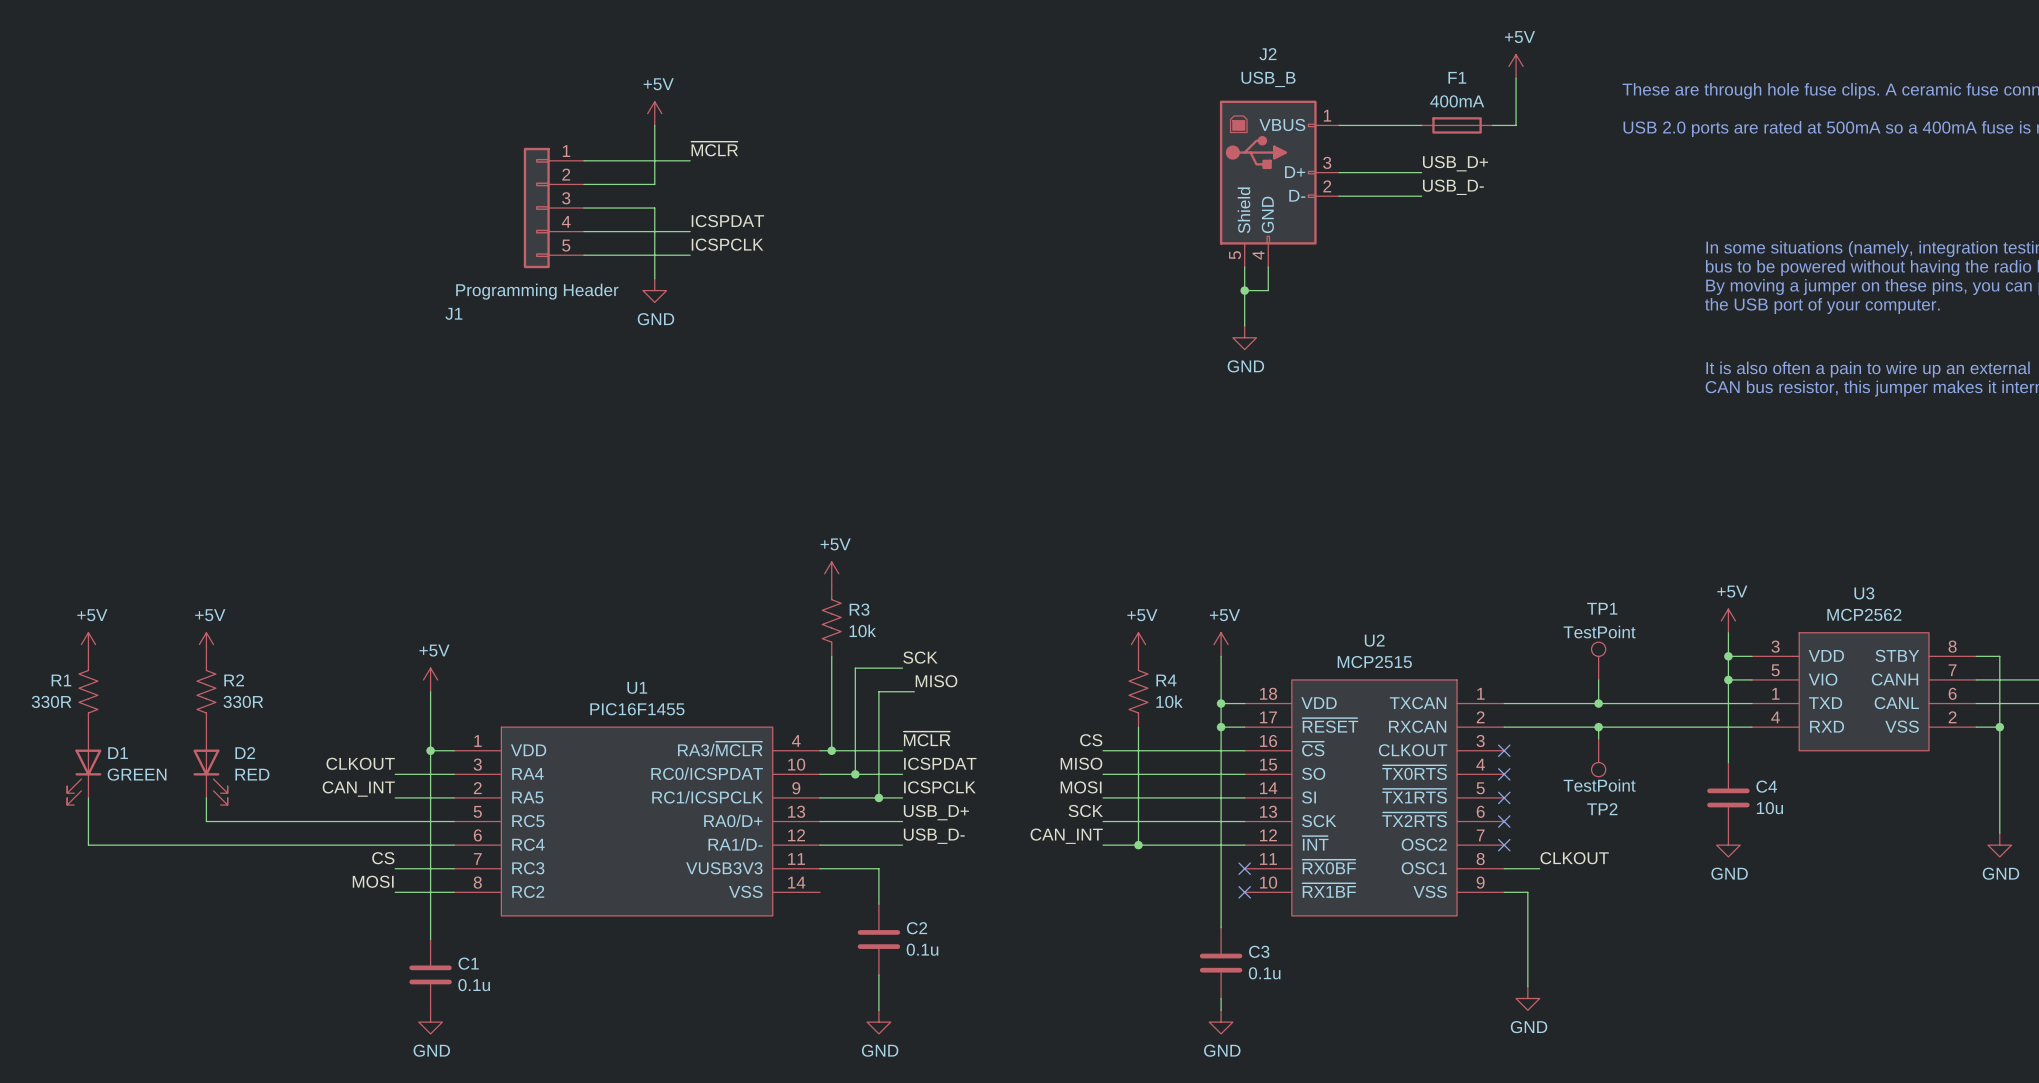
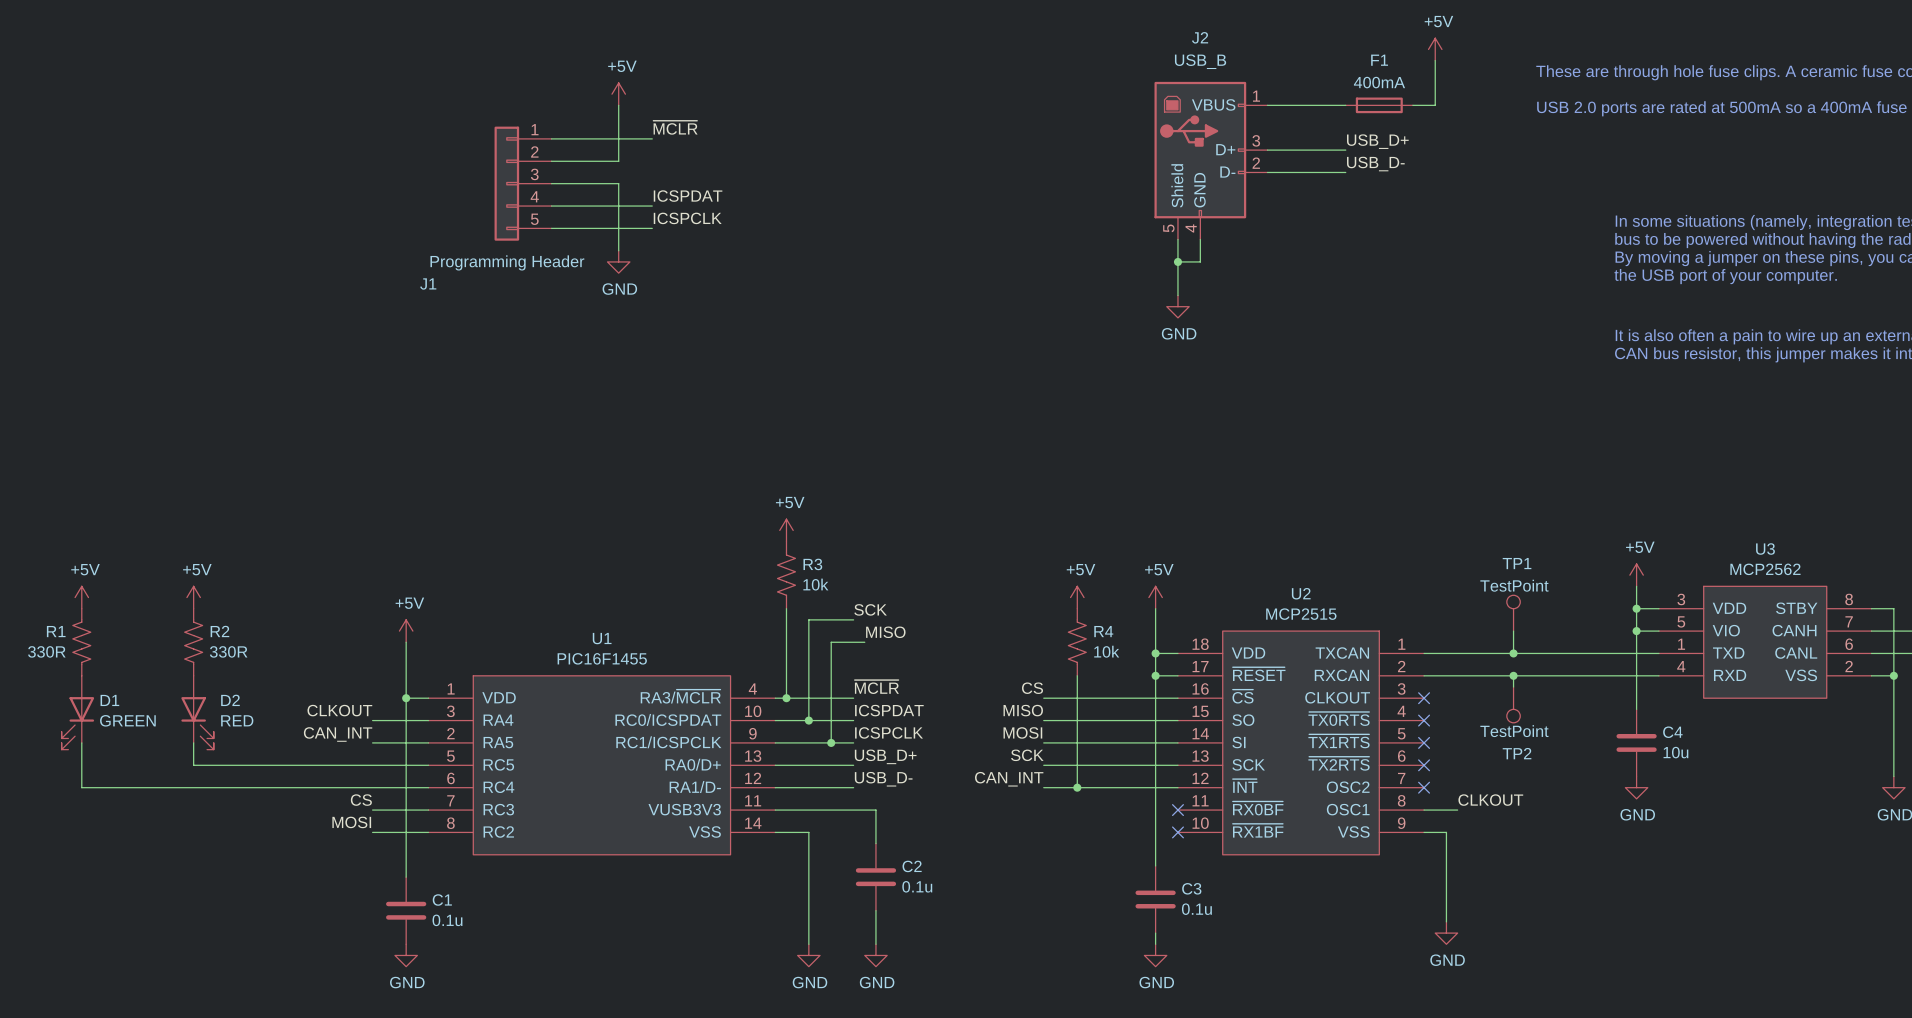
wire: (878, 868) (878, 904) -> (831, 810) (875, 810) (875, 843)
wire: none -> (775, 832) (808, 832) (808, 944)
C2 position: (878, 939) -> (875, 877)
wire: (878, 974) (878, 1010) -> (875, 910) (875, 944)
power symbol: none -> GND (808, 955)
power symbol: GND (878, 1022) -> none
power symbol: none -> GND (875, 955)

